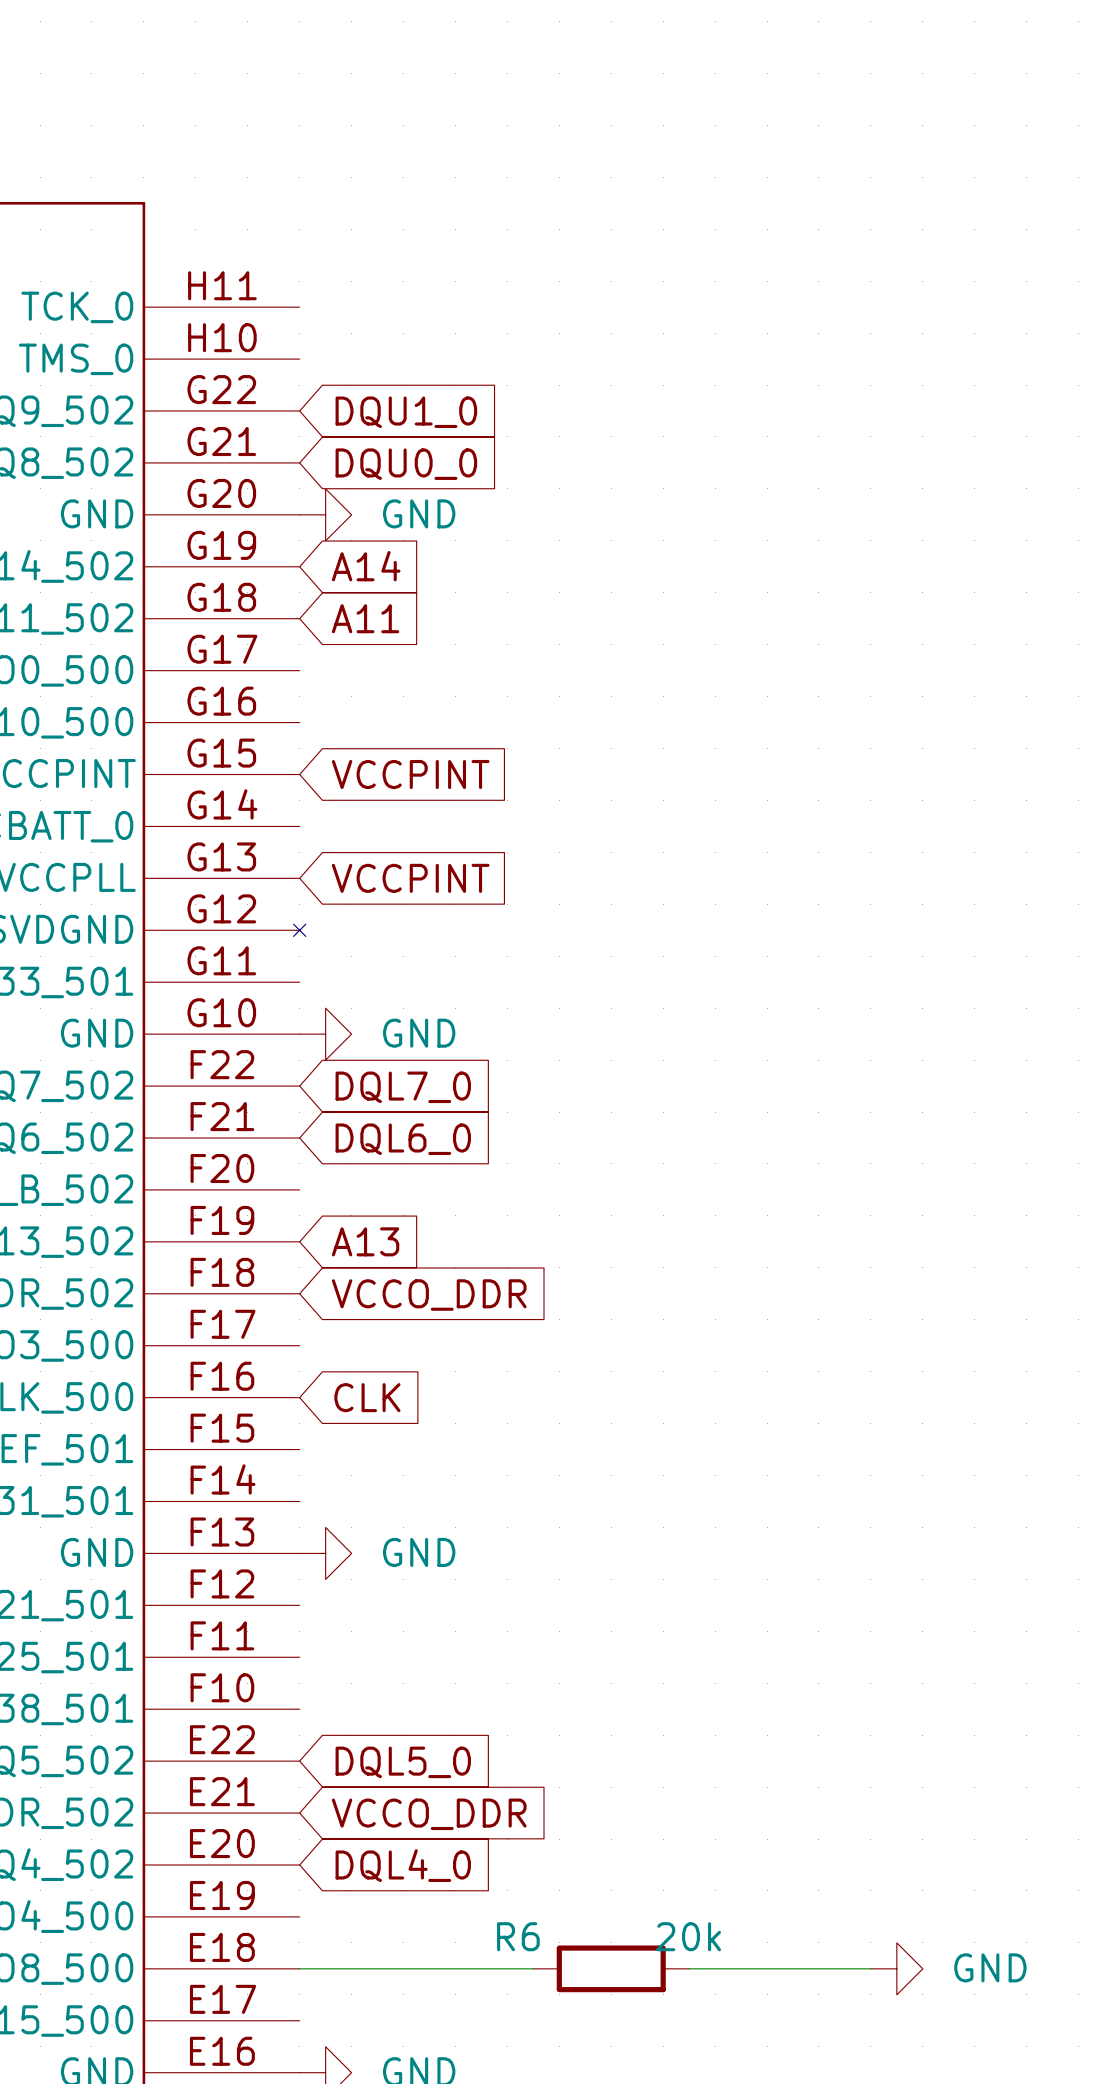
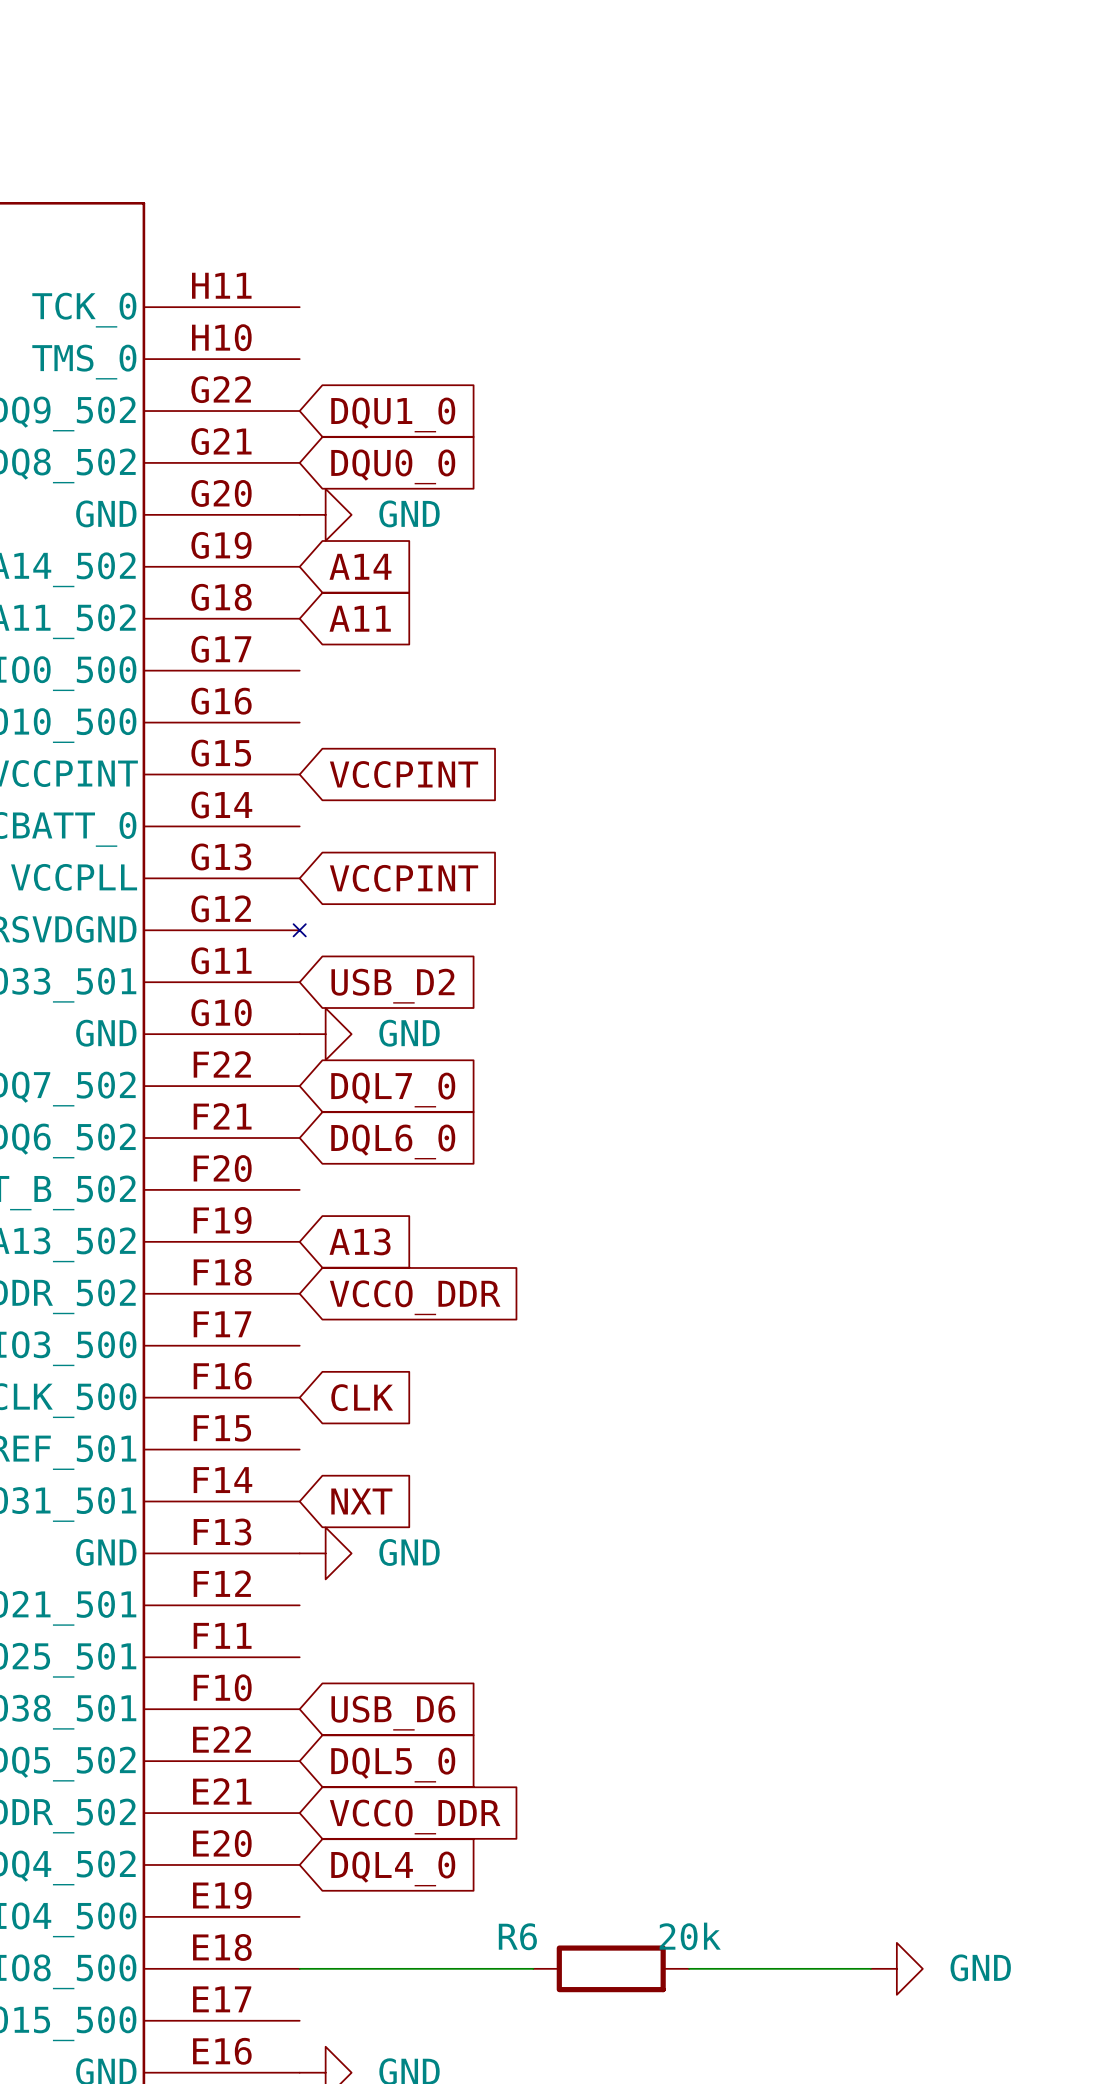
global label: none -> USB_D2 (392, 986)
global label: none -> NXT (361, 1501)
global label: none -> USB_D6 (393, 1713)

